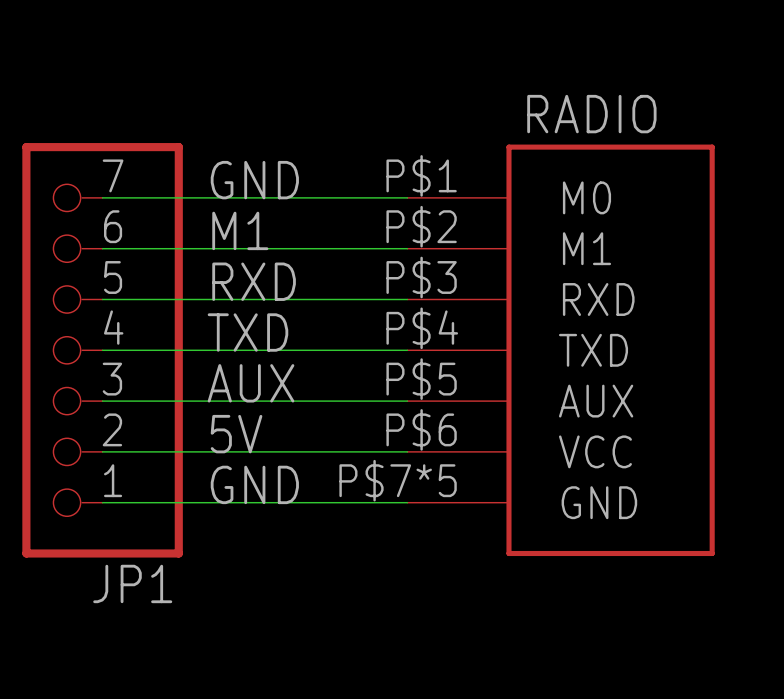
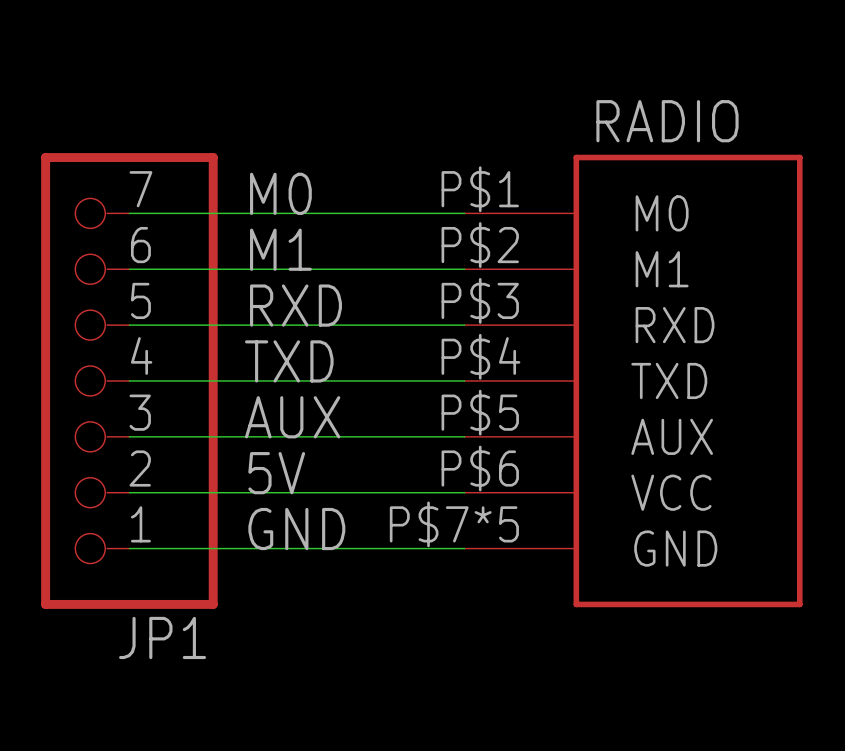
label: GND (254, 180) -> M0 (280, 193)

